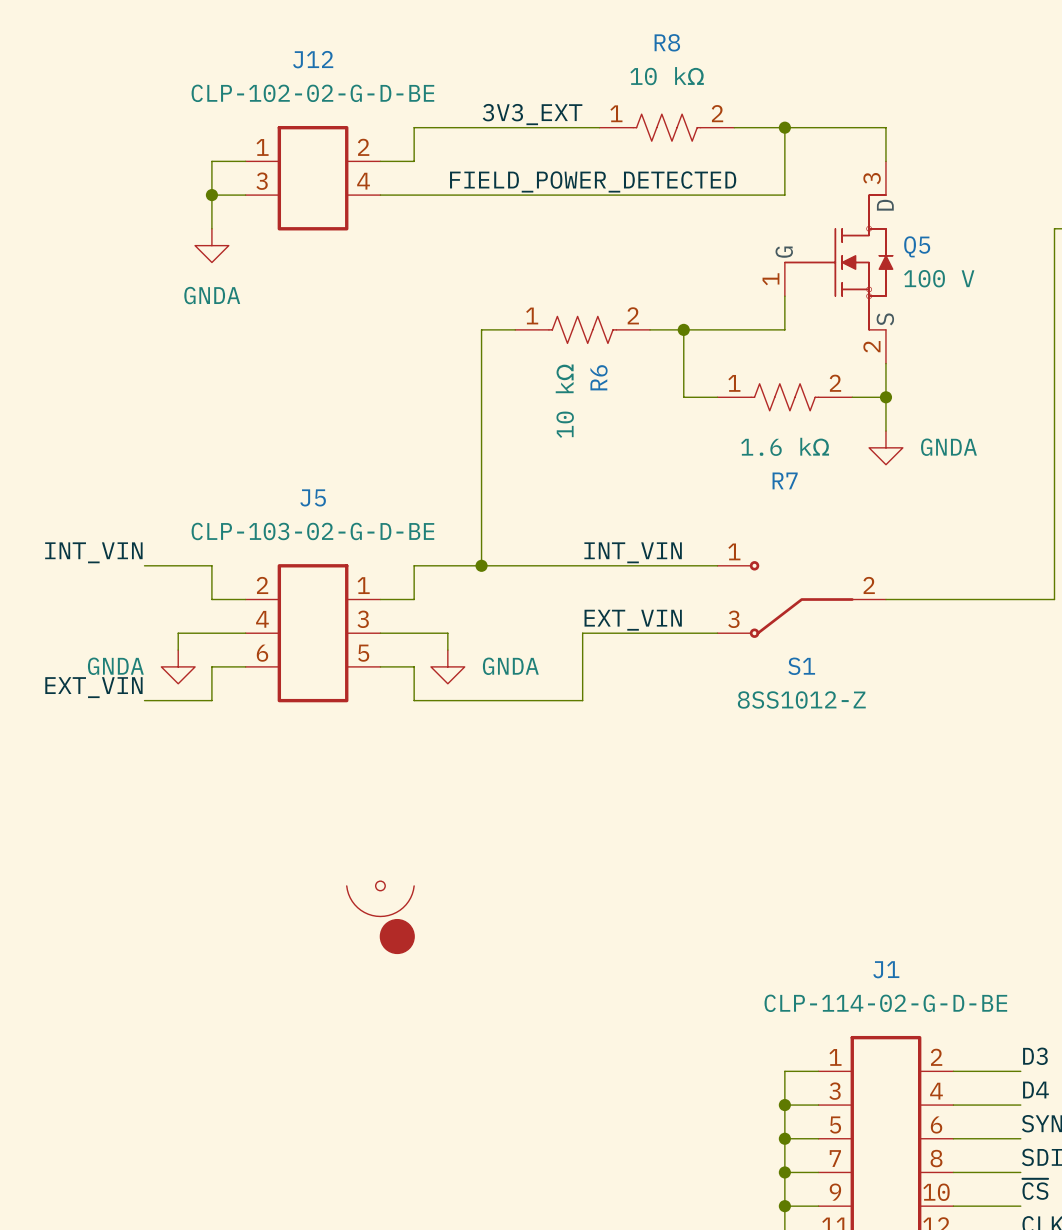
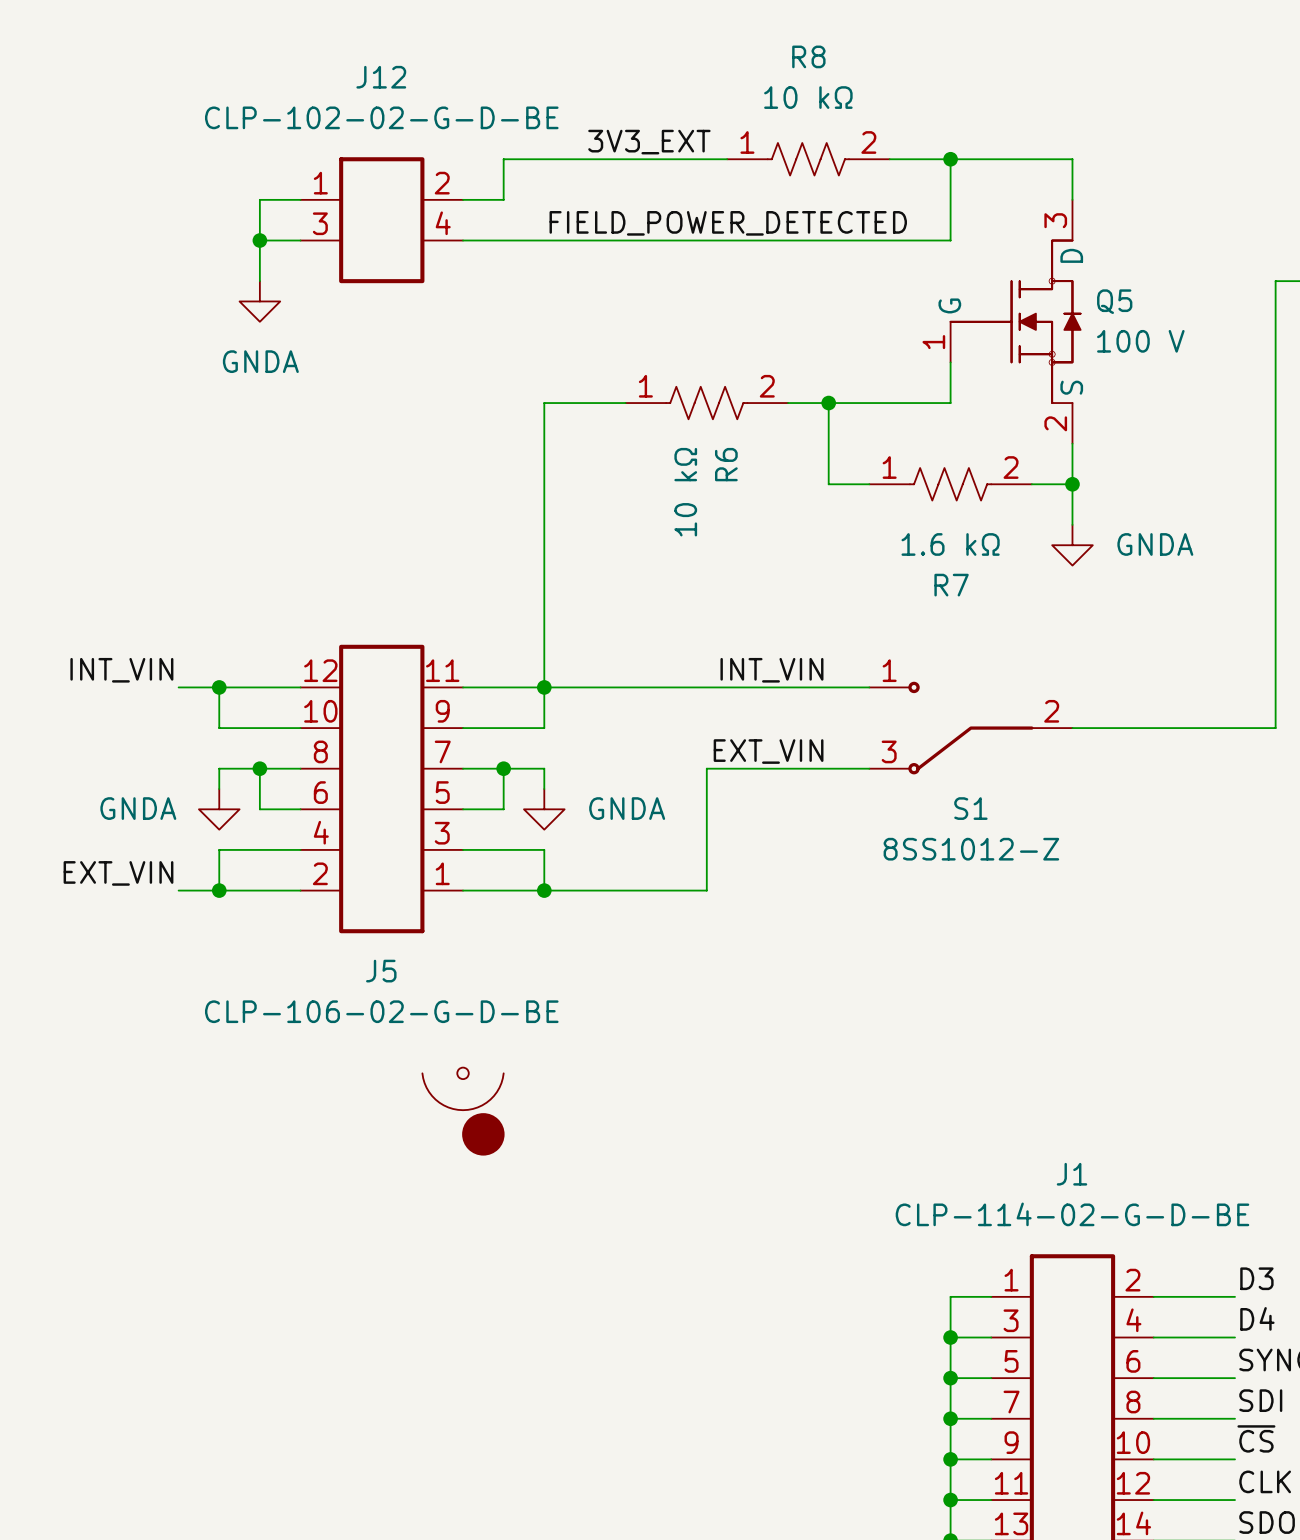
wire: (481, 329) (481, 565) -> (584, 403) (544, 403) (544, 728) (503, 728)
J5 name position: J5 (313, 497) -> J5 (381, 971)
J5 value: CLP-103-02-G-D-BE (312, 531) -> CLP-106-02-G-D-BE (381, 1011)
J5 symbol: [245, 564, 381, 703] -> [300, 644, 464, 934]
junction: none -> (219, 687)
wire: (211, 565) (211, 599) -> (219, 687) (219, 728) (259, 728)
wire: none -> (259, 687) (300, 687)
wire: (414, 565) (414, 599) -> (503, 687) (463, 687)
junction position: (481, 565) -> (544, 687)
wire: none -> (259, 768) (259, 809)
junction: none -> (259, 768)
wire: none -> (503, 768) (503, 809)
junction: none -> (503, 768)
wire: (211, 666) (211, 700) -> (300, 849) (259, 849)
wire: (414, 666) (414, 700) -> (463, 849) (503, 849)
label position: EXT_VIN (93, 687) -> EXT_VIN (118, 873)
wire: (144, 700) (178, 700) -> (219, 890) (219, 849)
wire: (447, 700) (582, 700) -> (463, 890) (706, 890) (706, 849)
wire: none -> (544, 849) (544, 890)
wire: none -> (178, 890) (300, 890)
junction: none -> (219, 890)
junction: none -> (544, 890)

